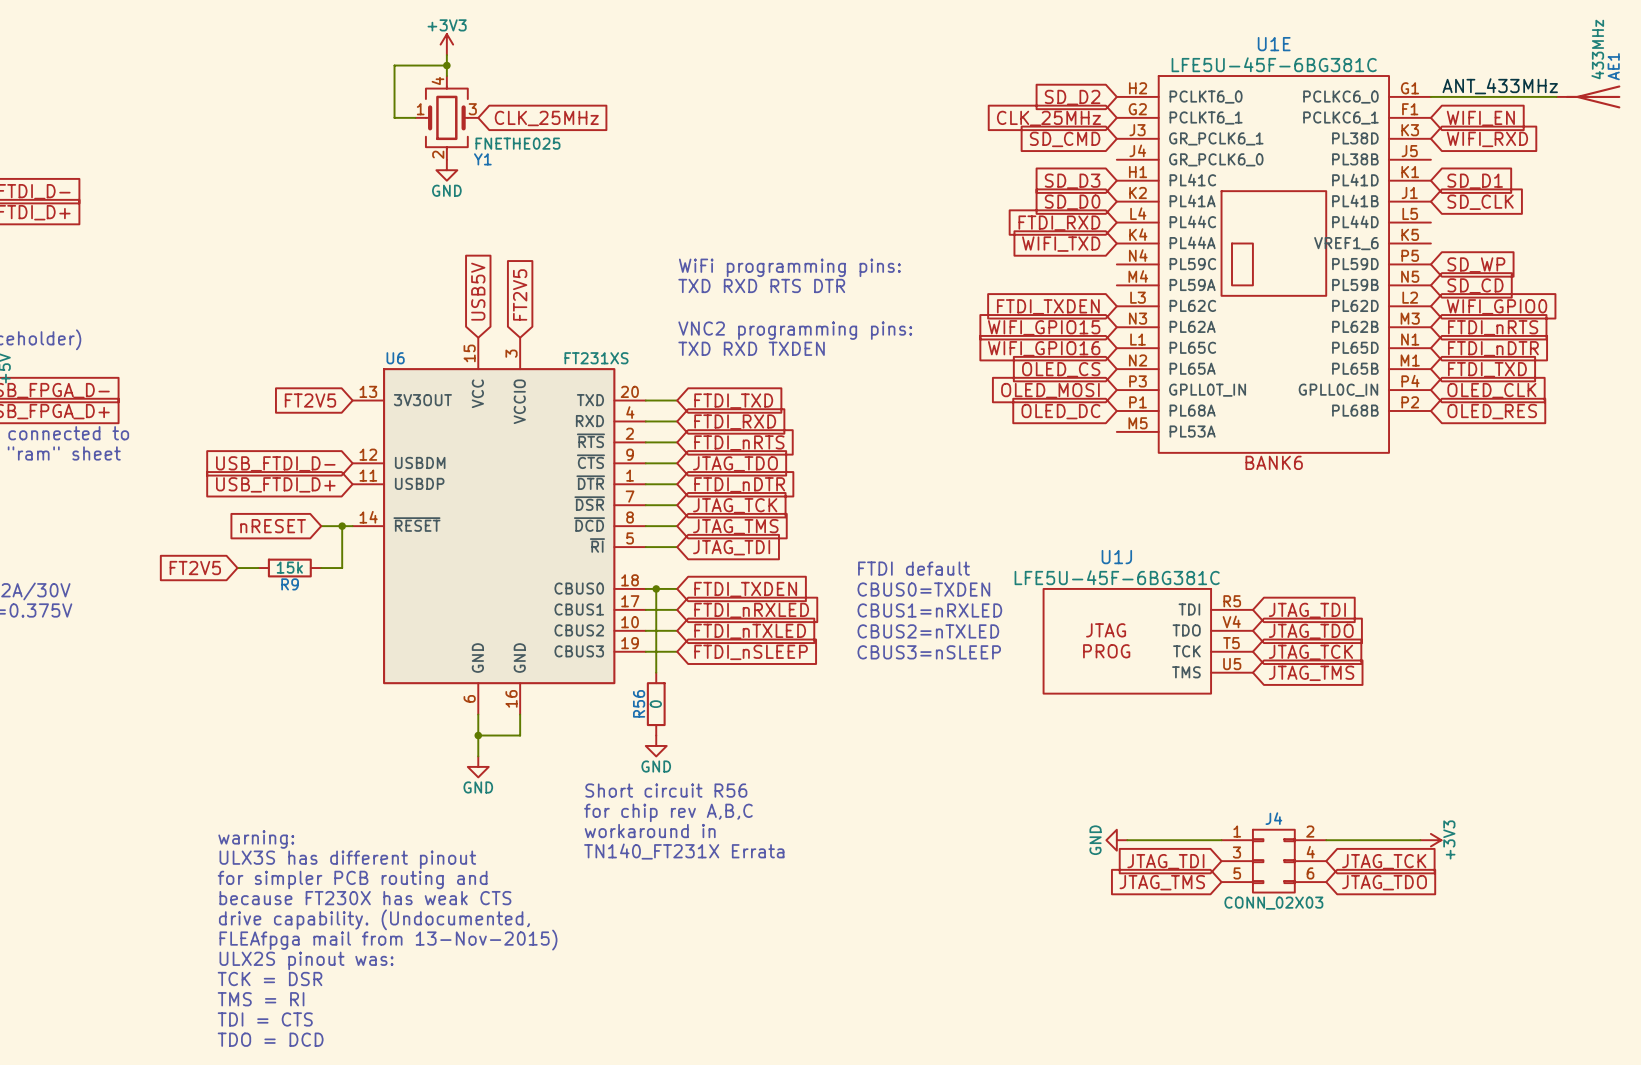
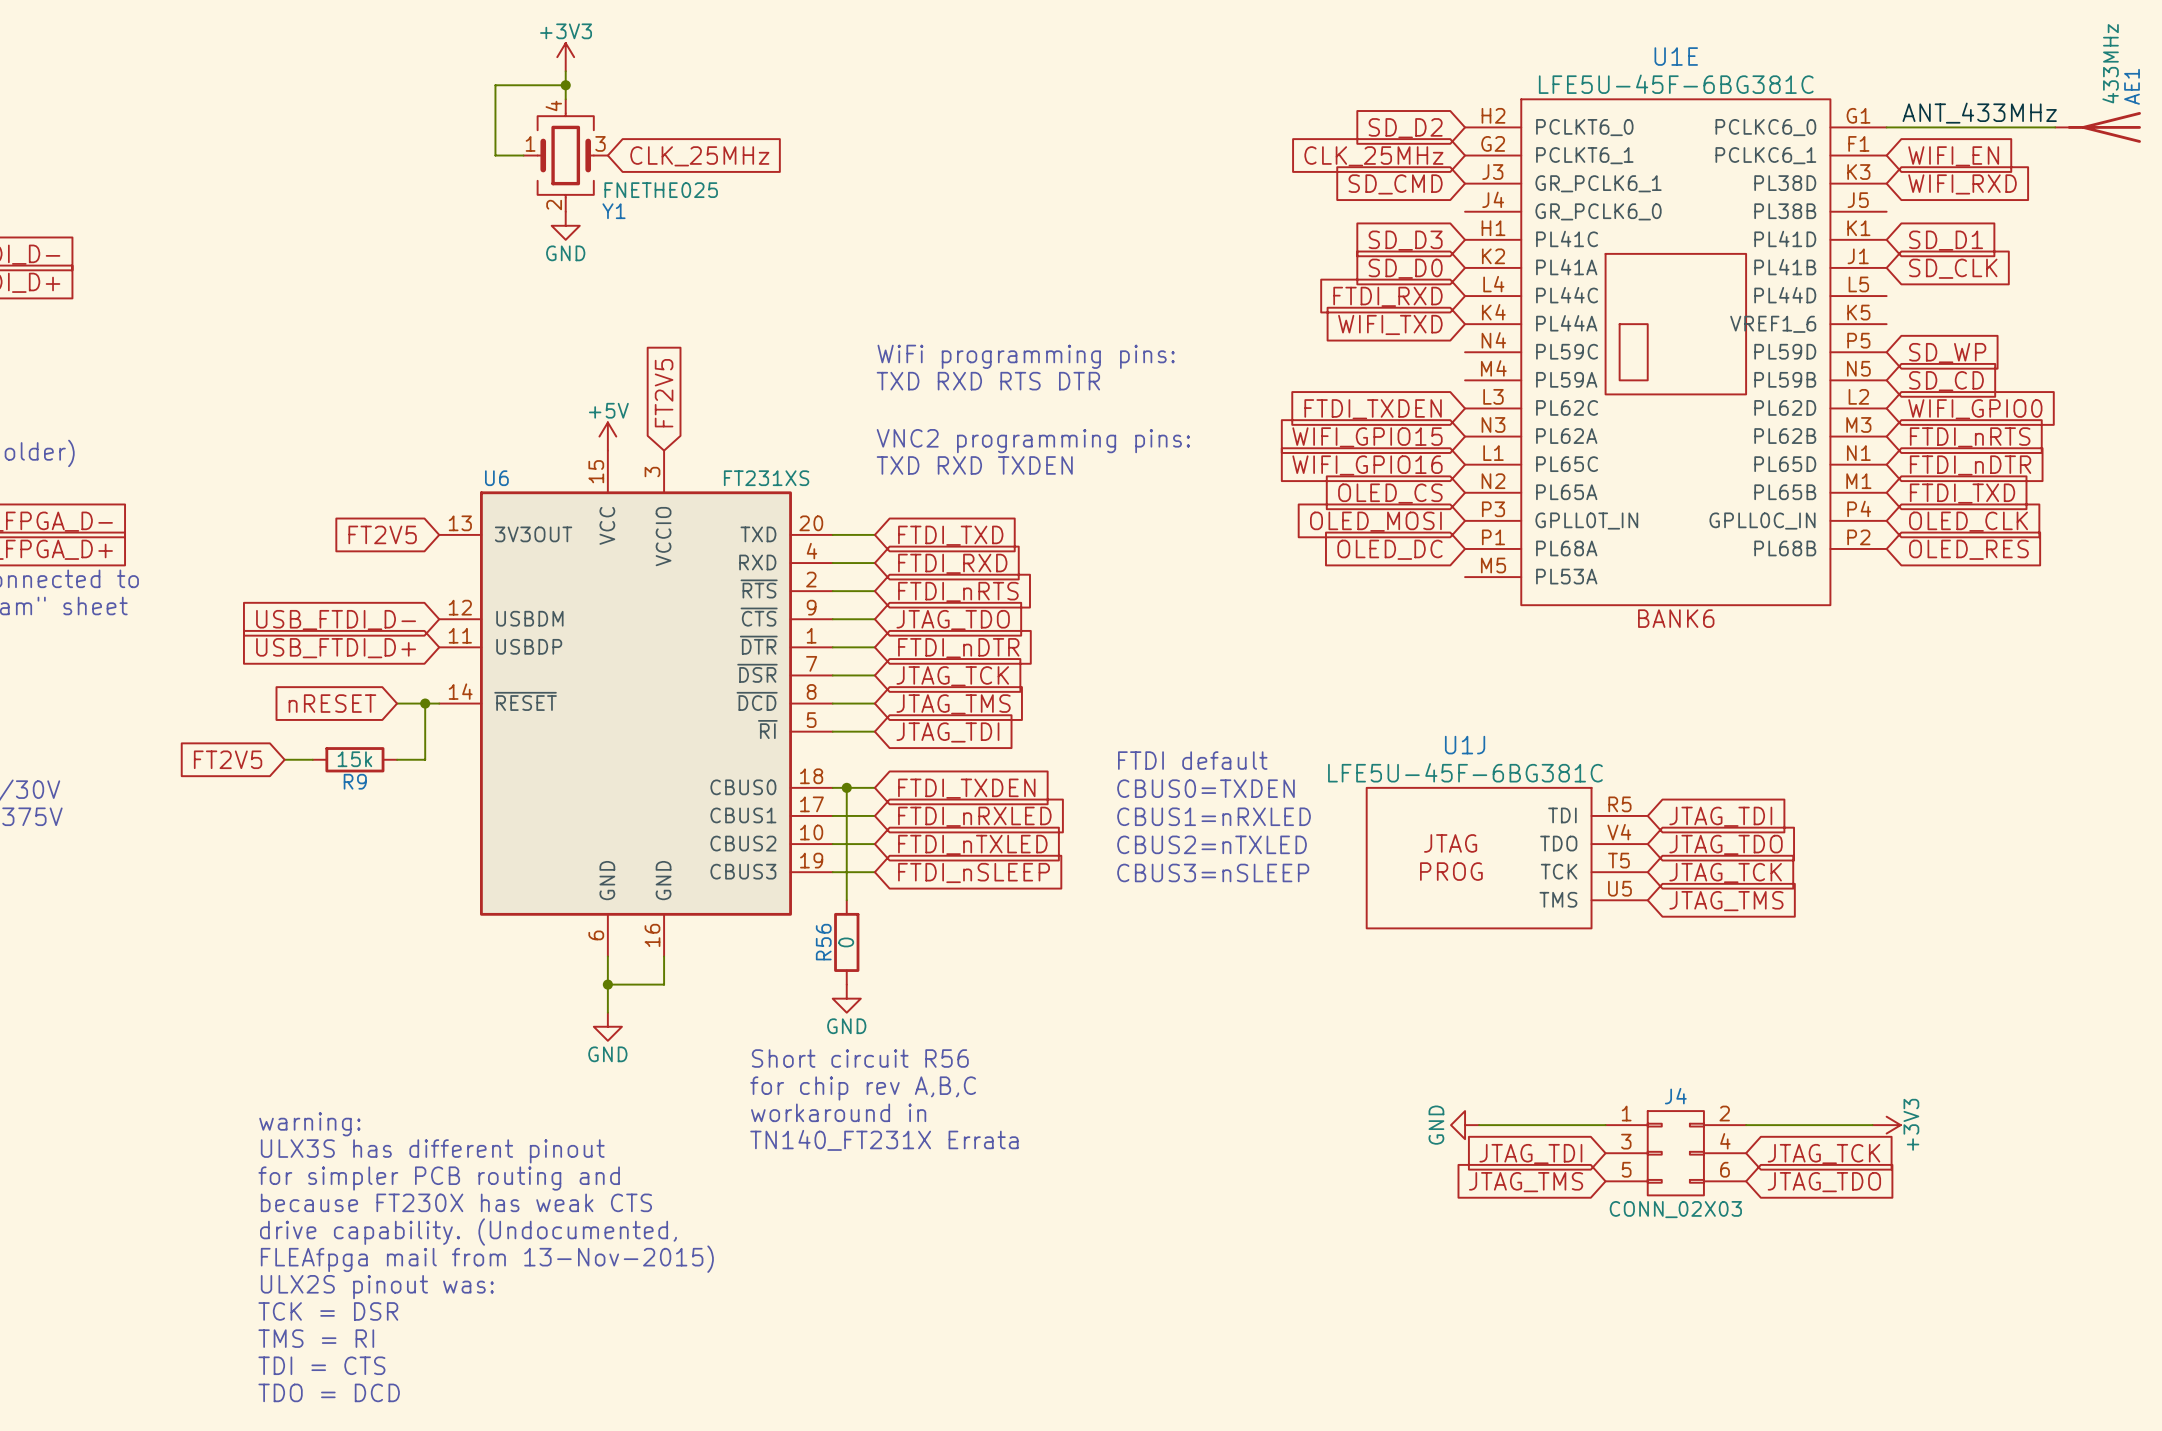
global label: USB5V (478, 291) -> none
power symbol: none -> +5V (607, 436)

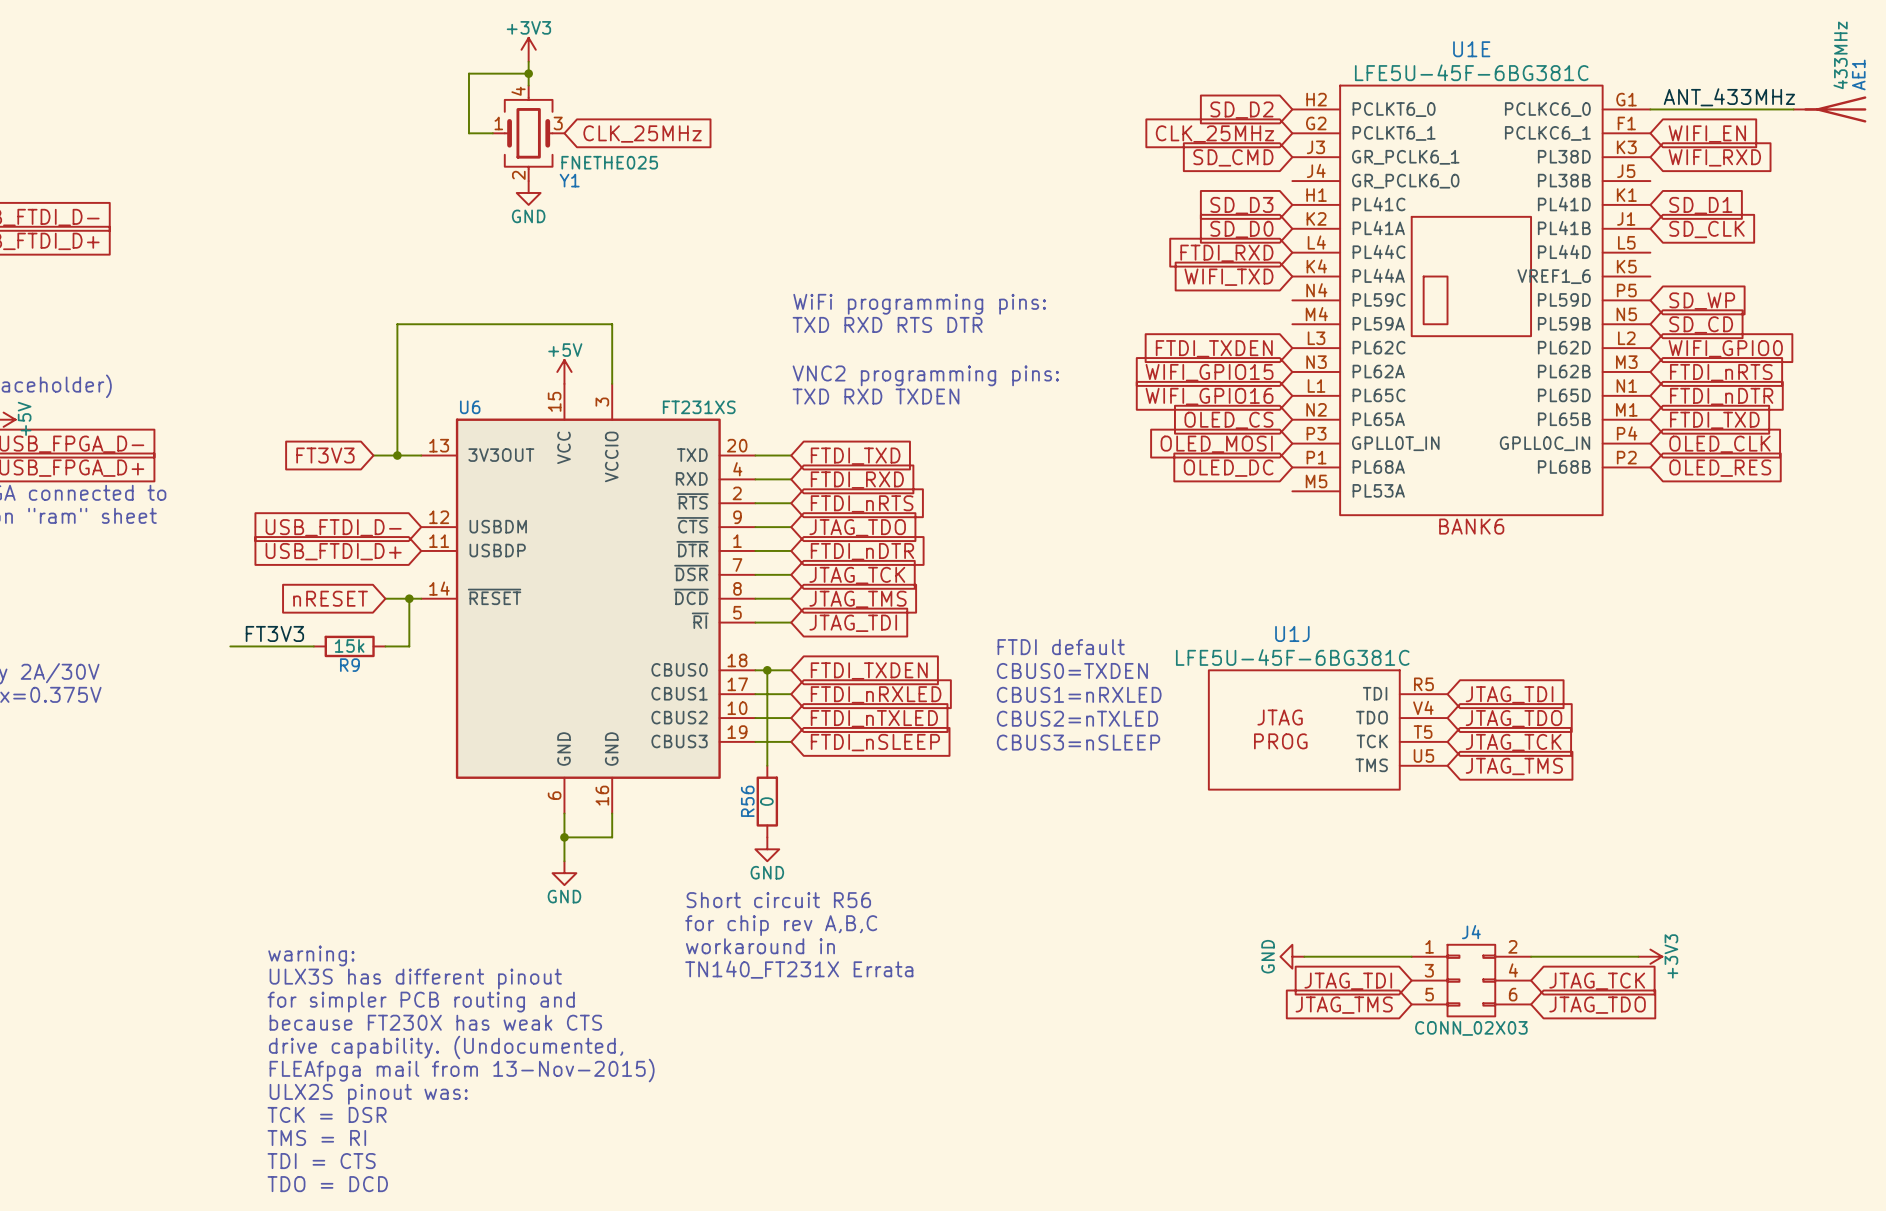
global label: FT2V5 (664, 393) -> none
wire: none -> (612, 383) (612, 324) (397, 324) (397, 455)
global label: none -> FT3V3 (325, 455)
global label: FT2V5 (382, 534) -> none
wire: none -> (373, 455) (421, 455)
junction: none -> (397, 455)
label: none -> FT3V3 (274, 633)
wire: none -> (230, 646) (289, 646)
global label: FT2V5 (228, 759) -> none

